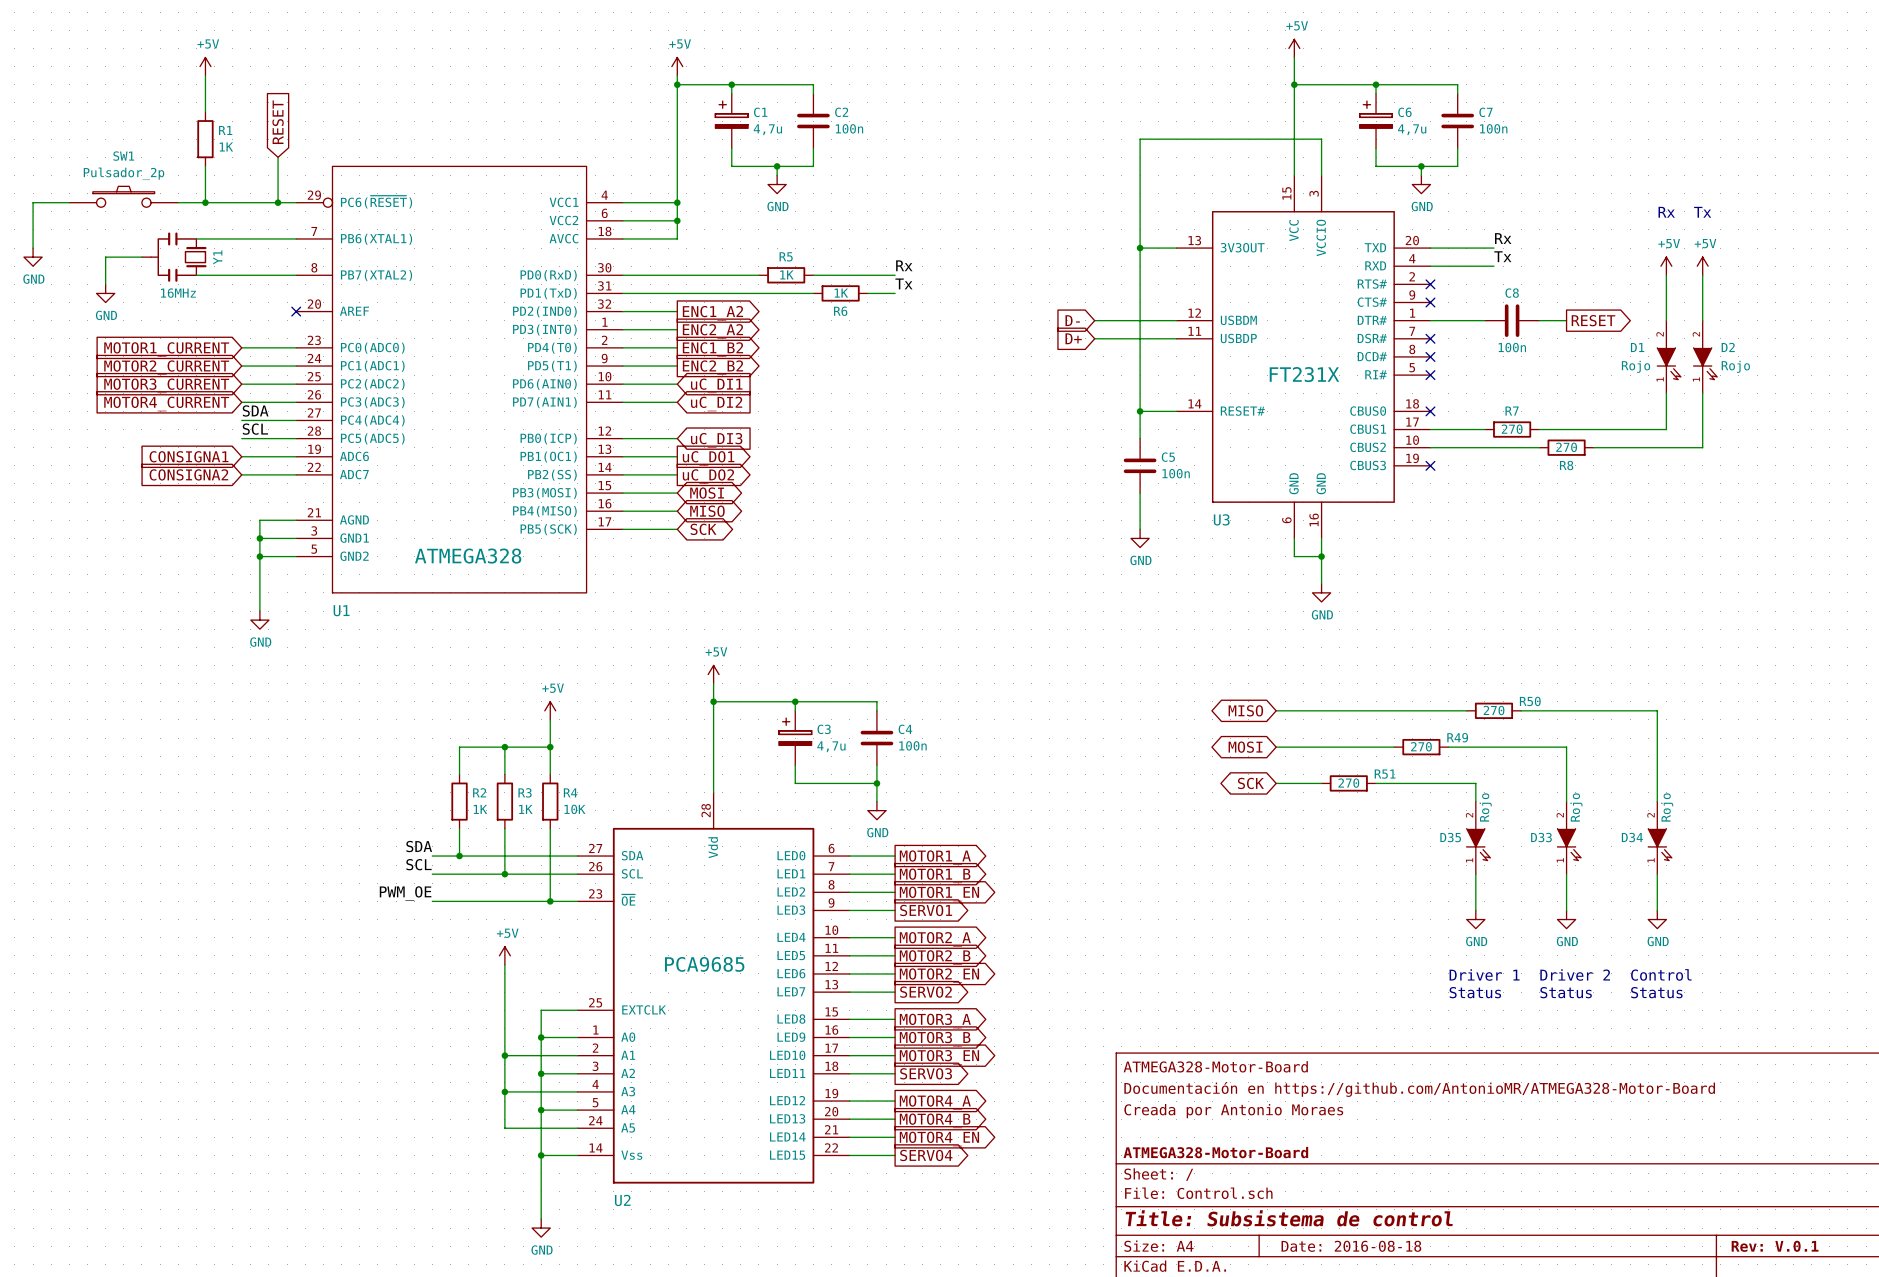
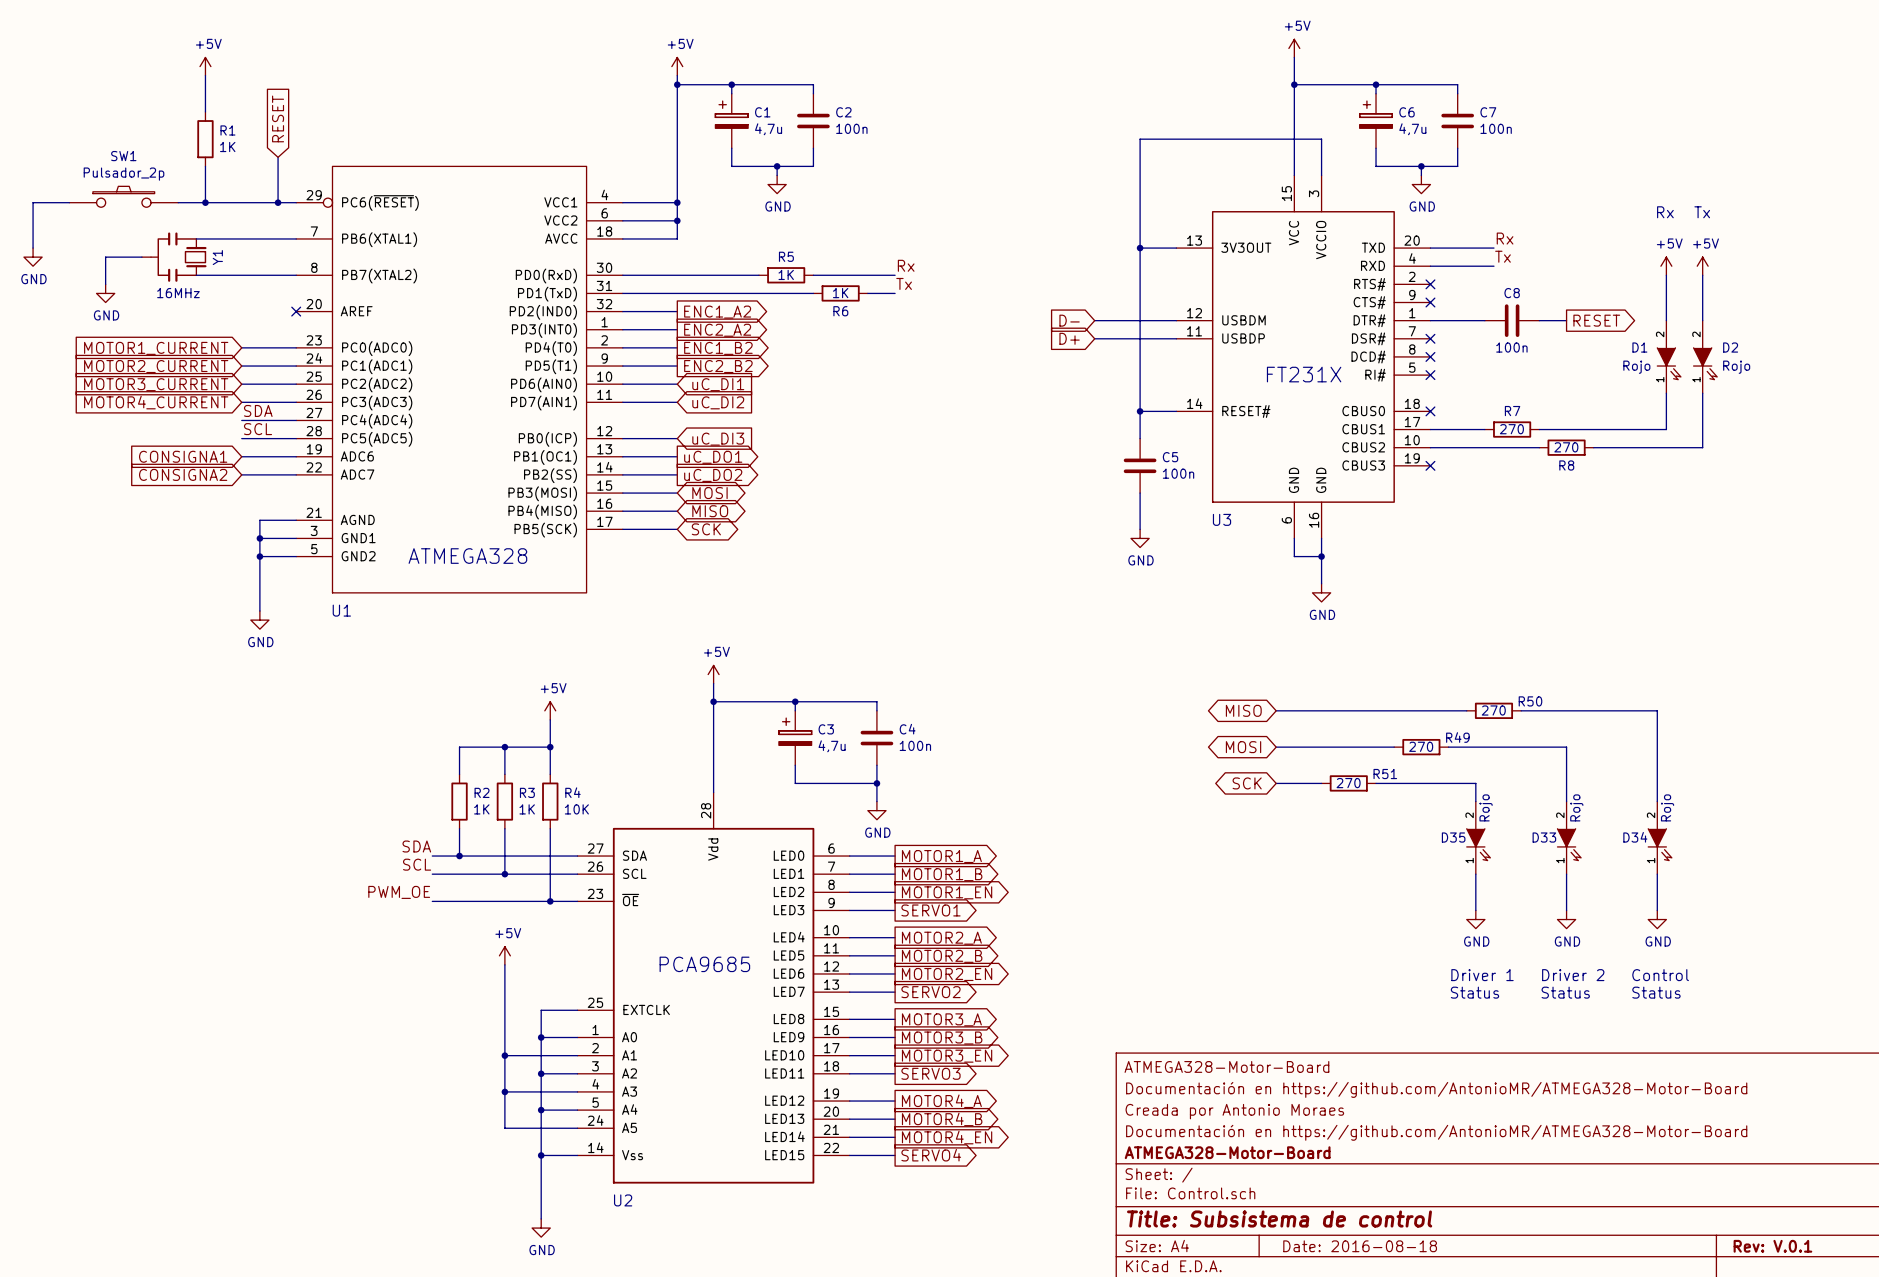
title block: none -> Documentación en https://github.com/AntonioMR/ATMEGA328-Motor-Board (1436, 1132)

